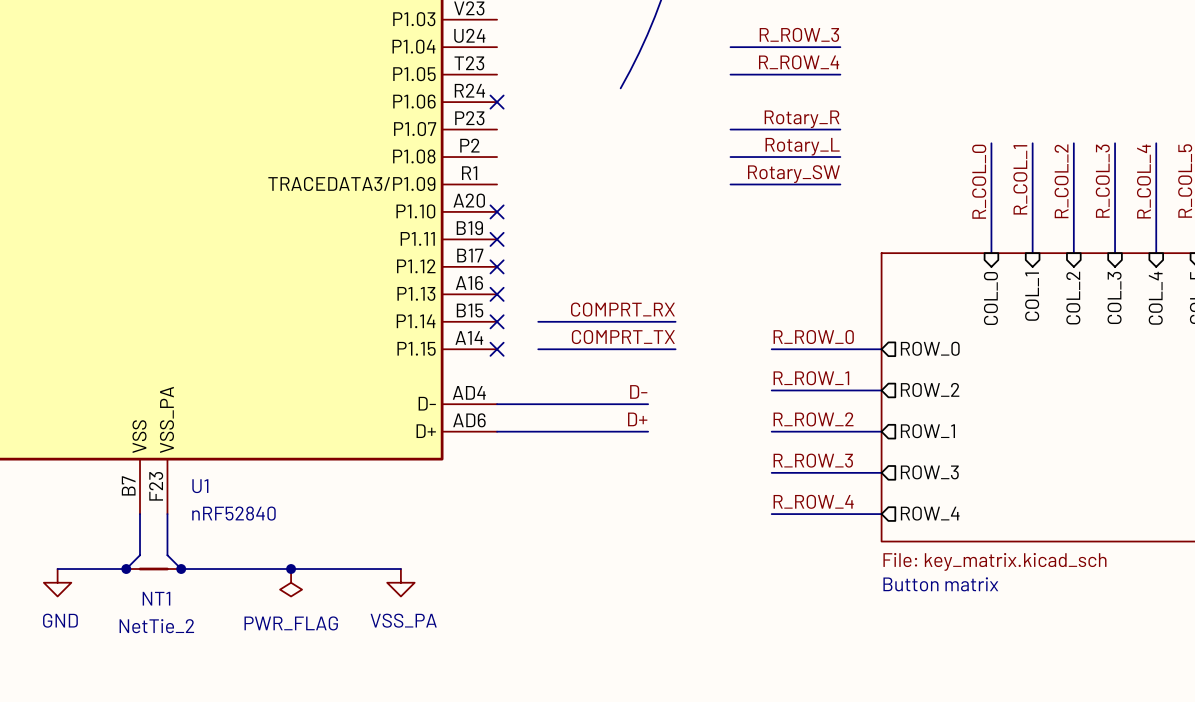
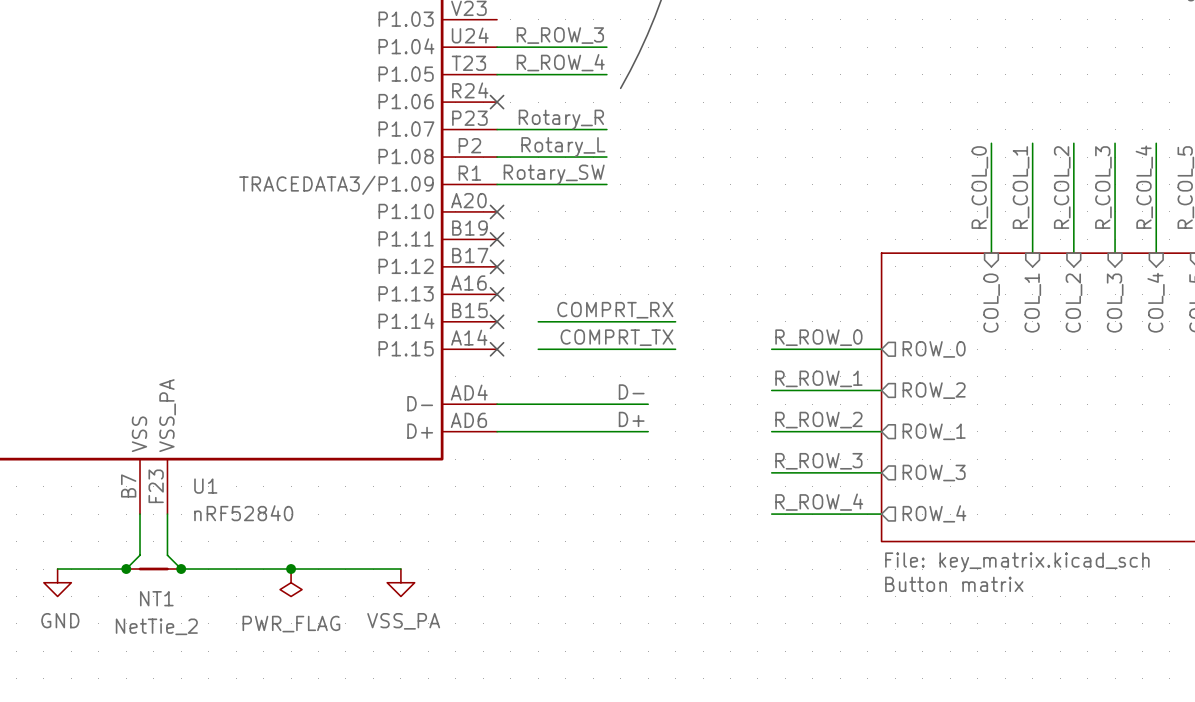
label position: R_ROW_3 (799, 34) -> R_ROW_3 (560, 35)
wire: (730, 47) (840, 47) -> (497, 47) (606, 47)
label position: R_ROW_4 (799, 62) -> R_ROW_4 (560, 62)
wire: (730, 74) (840, 74) -> (497, 74) (606, 74)
label position: Rotary_R (802, 119) -> Rotary_R (561, 119)
wire: (730, 129) (840, 129) -> (497, 129) (606, 129)
label position: Rotary_L (802, 146) -> Rotary_L (563, 147)
wire: (730, 157) (840, 157) -> (497, 157) (606, 157)
label position: Rotary_SW (793, 174) -> Rotary_SW (554, 174)
wire: (730, 184) (840, 184) -> (497, 184) (606, 184)

